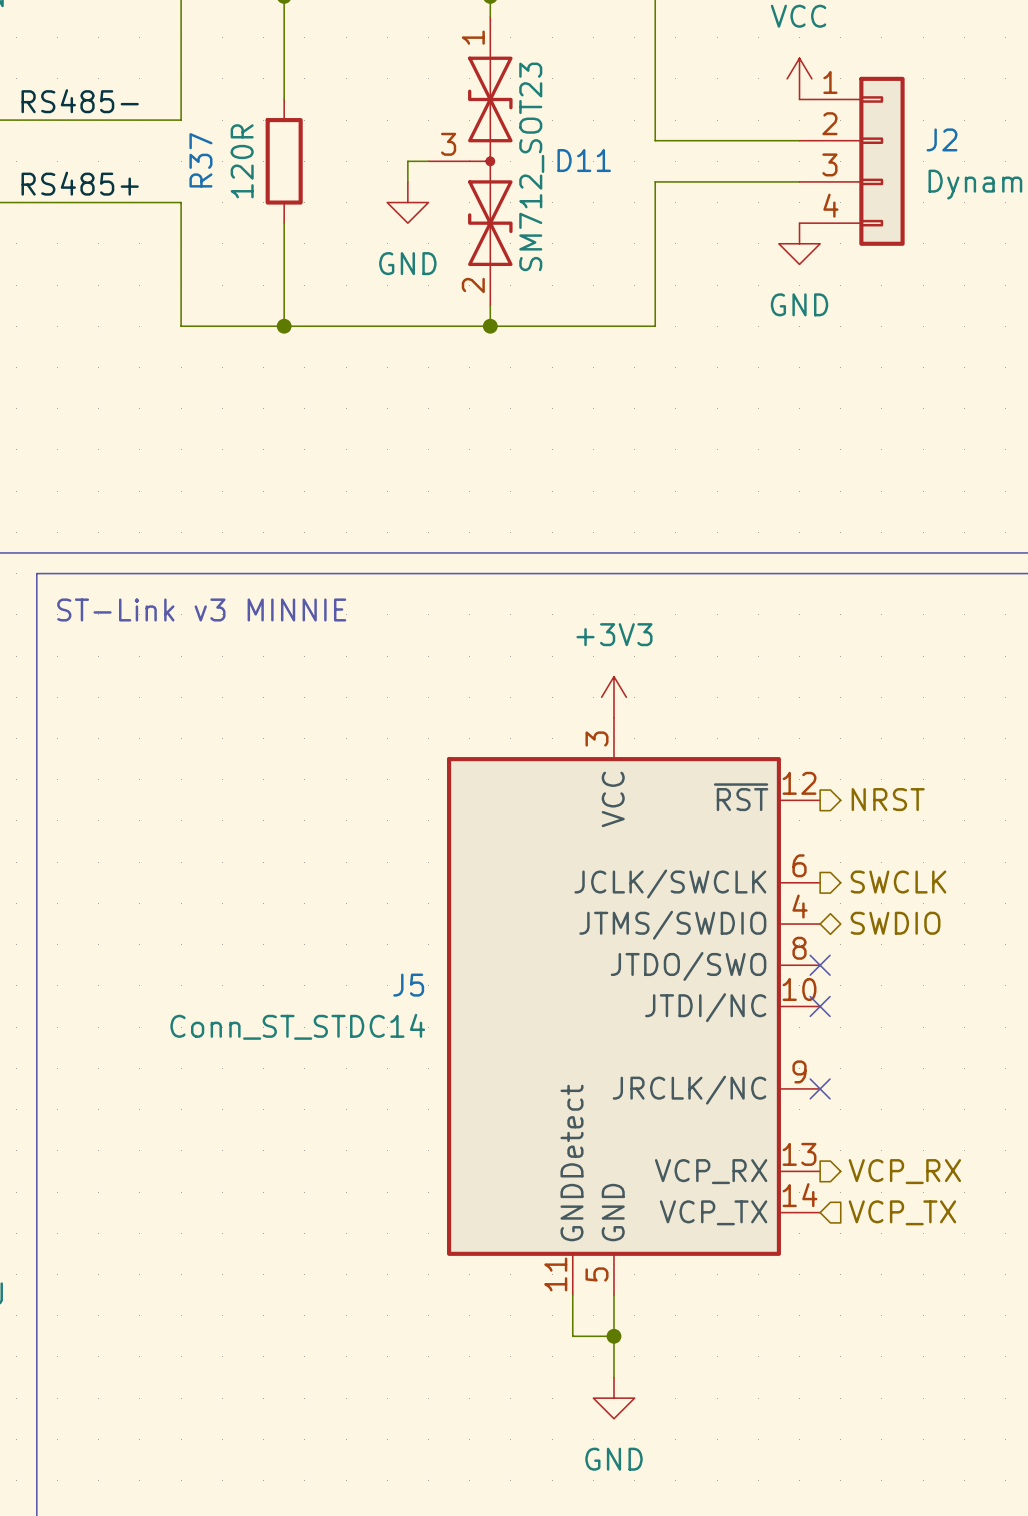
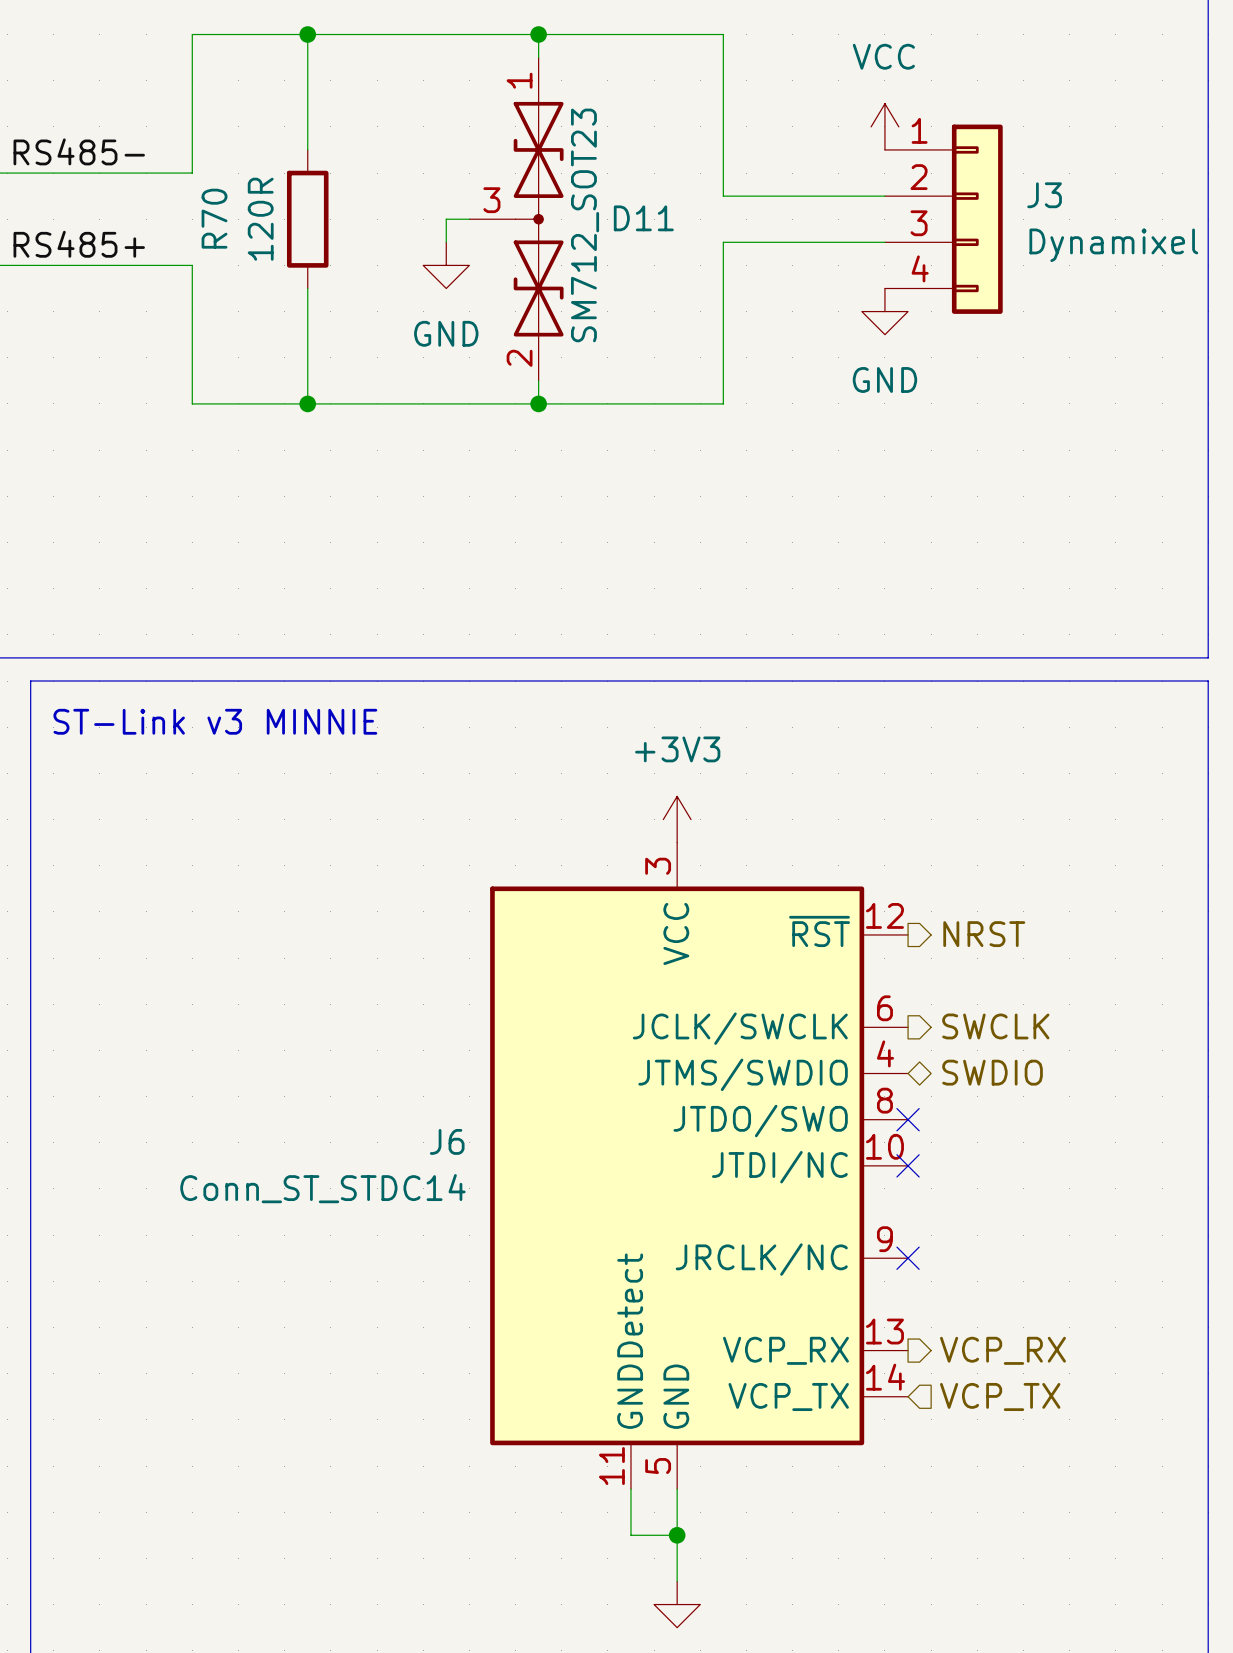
J2 name: J2 (942, 139) -> J3 (1044, 195)
R37 name: R37 (200, 160) -> R70 (214, 218)
J5 name: J5 (408, 985) -> J6 (447, 1141)

